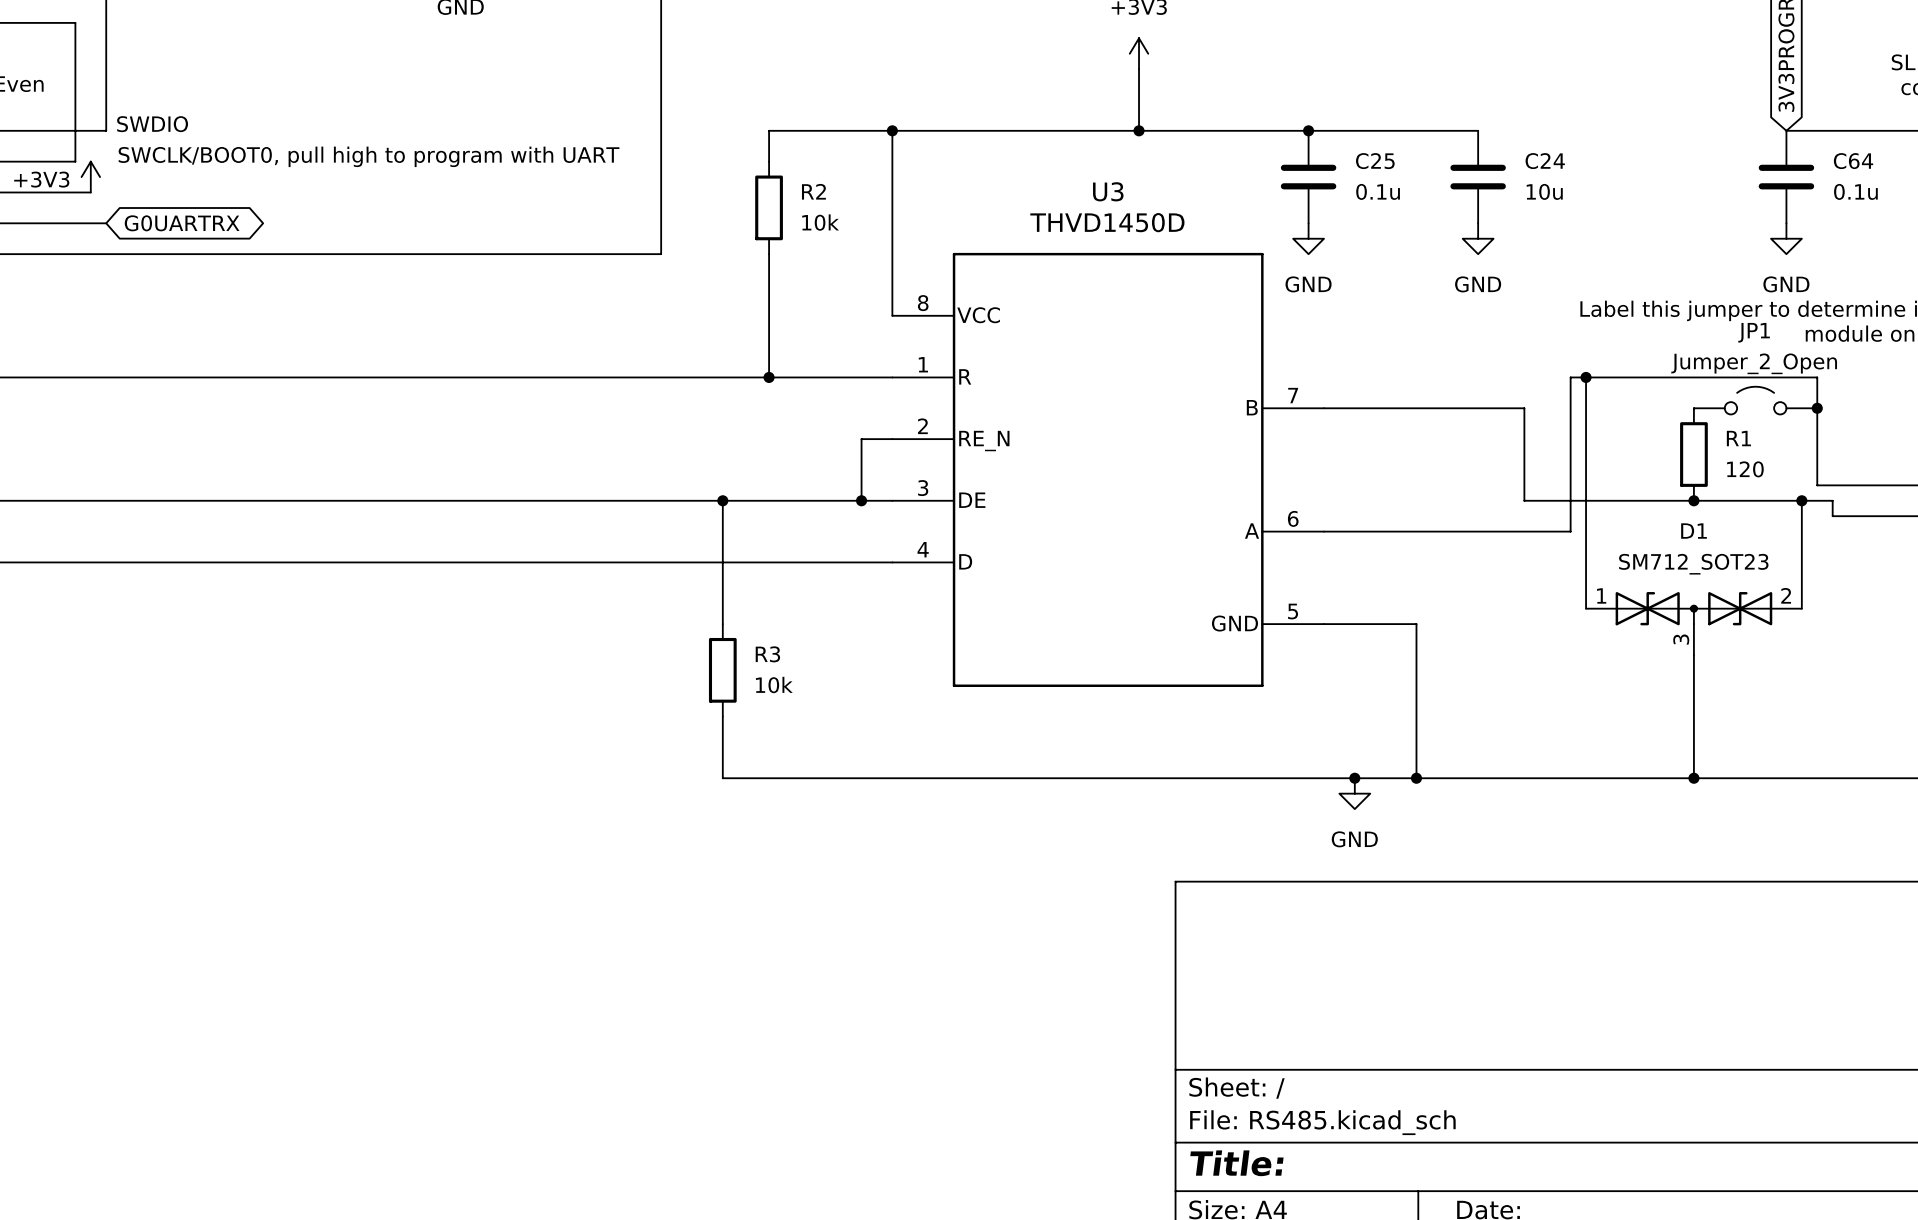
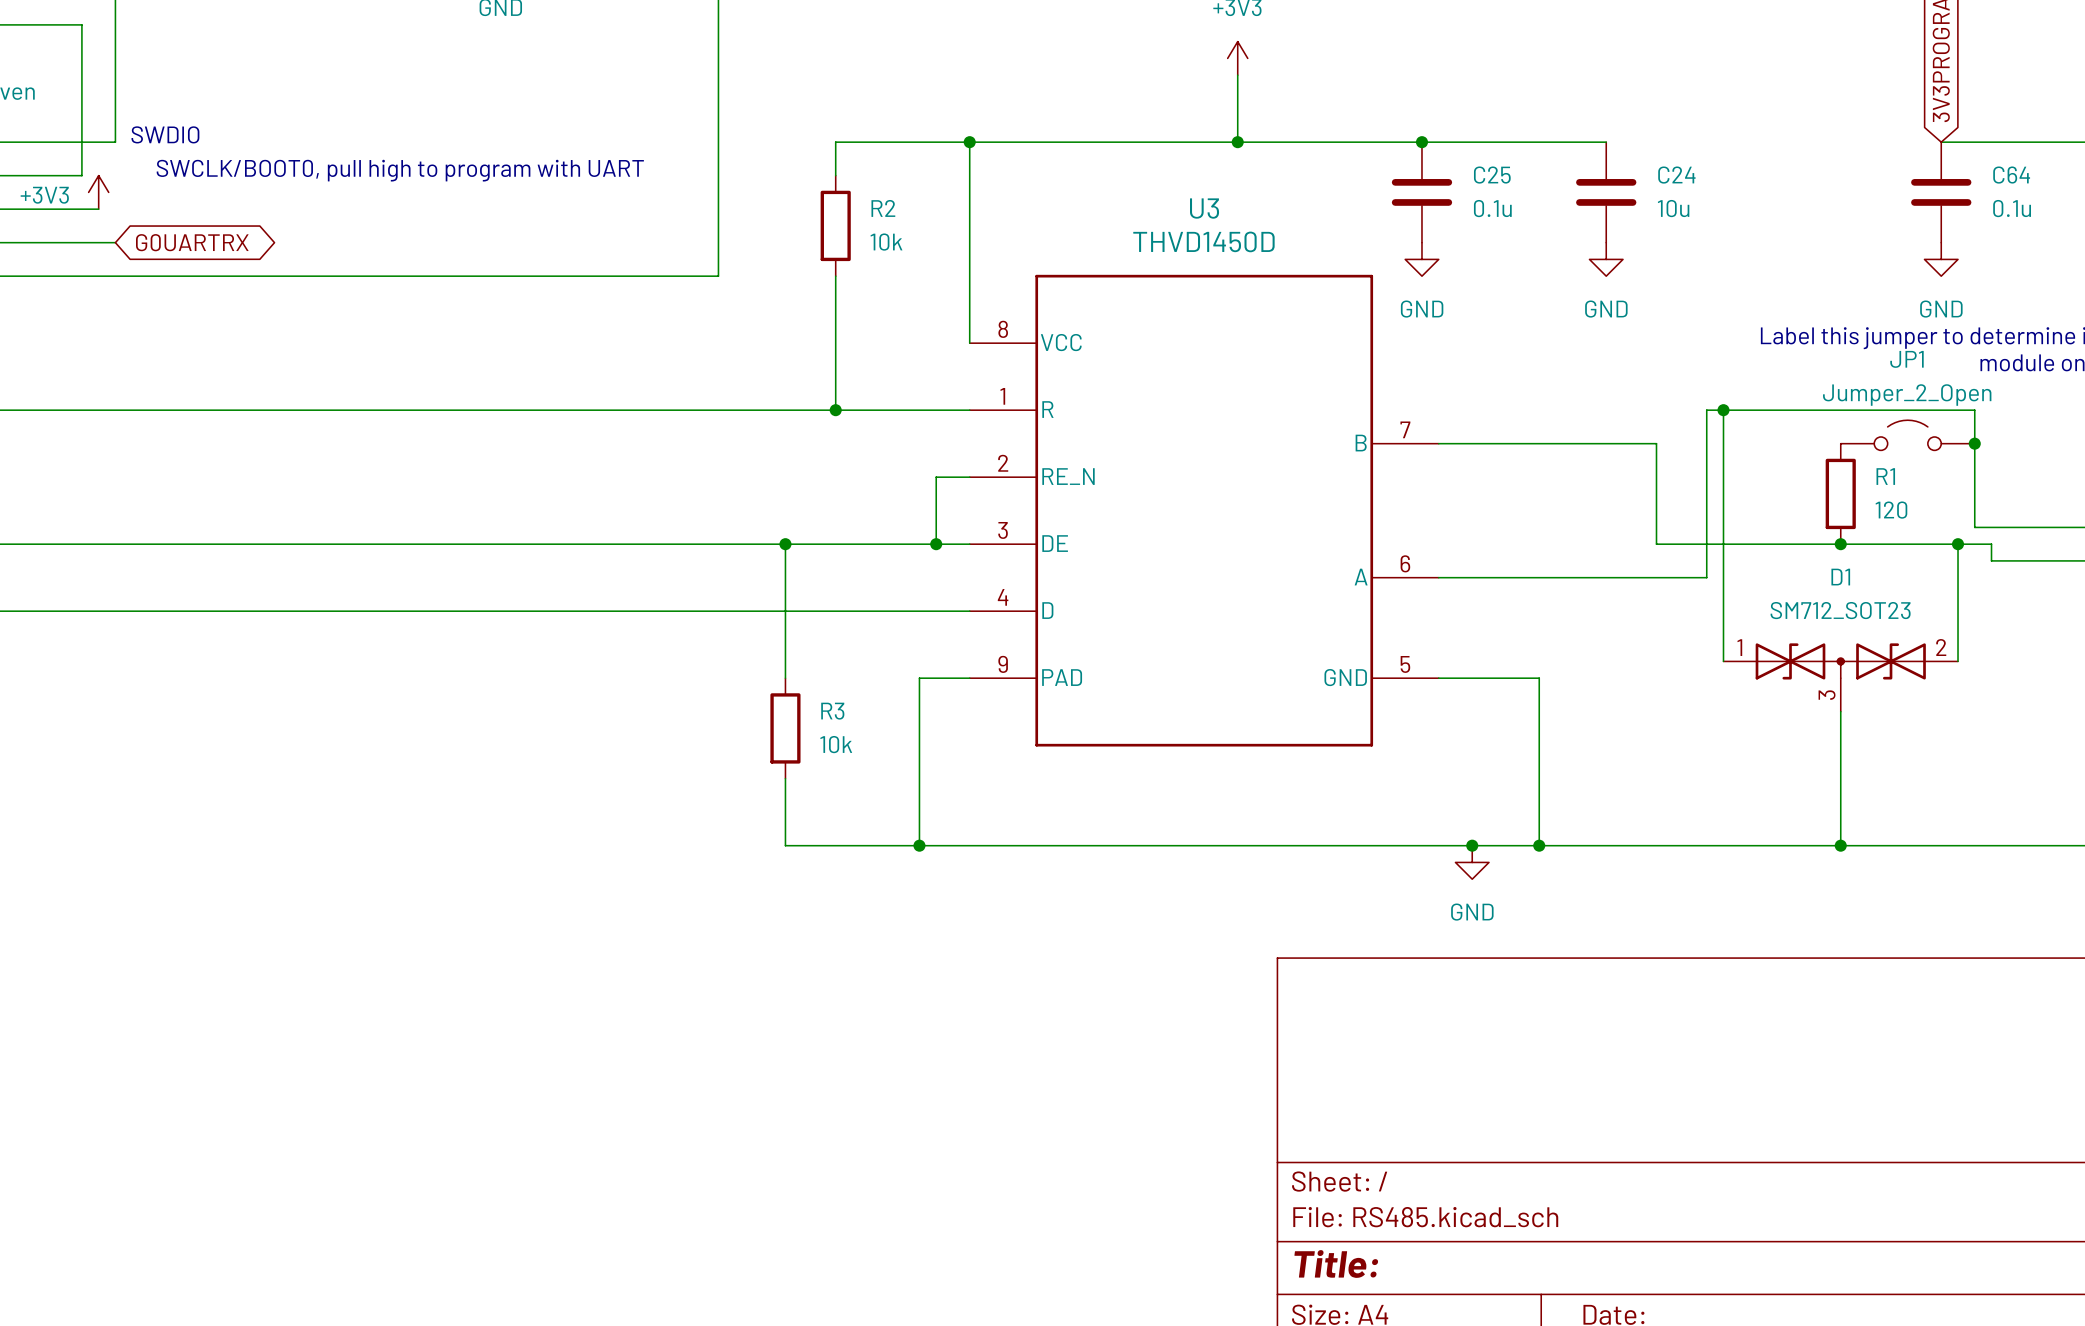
U3 symbol: [892, 252, 1324, 687] -> [969, 274, 1439, 747]
wire: none -> (969, 678) (919, 678) (919, 845)
junction: none -> (919, 845)

